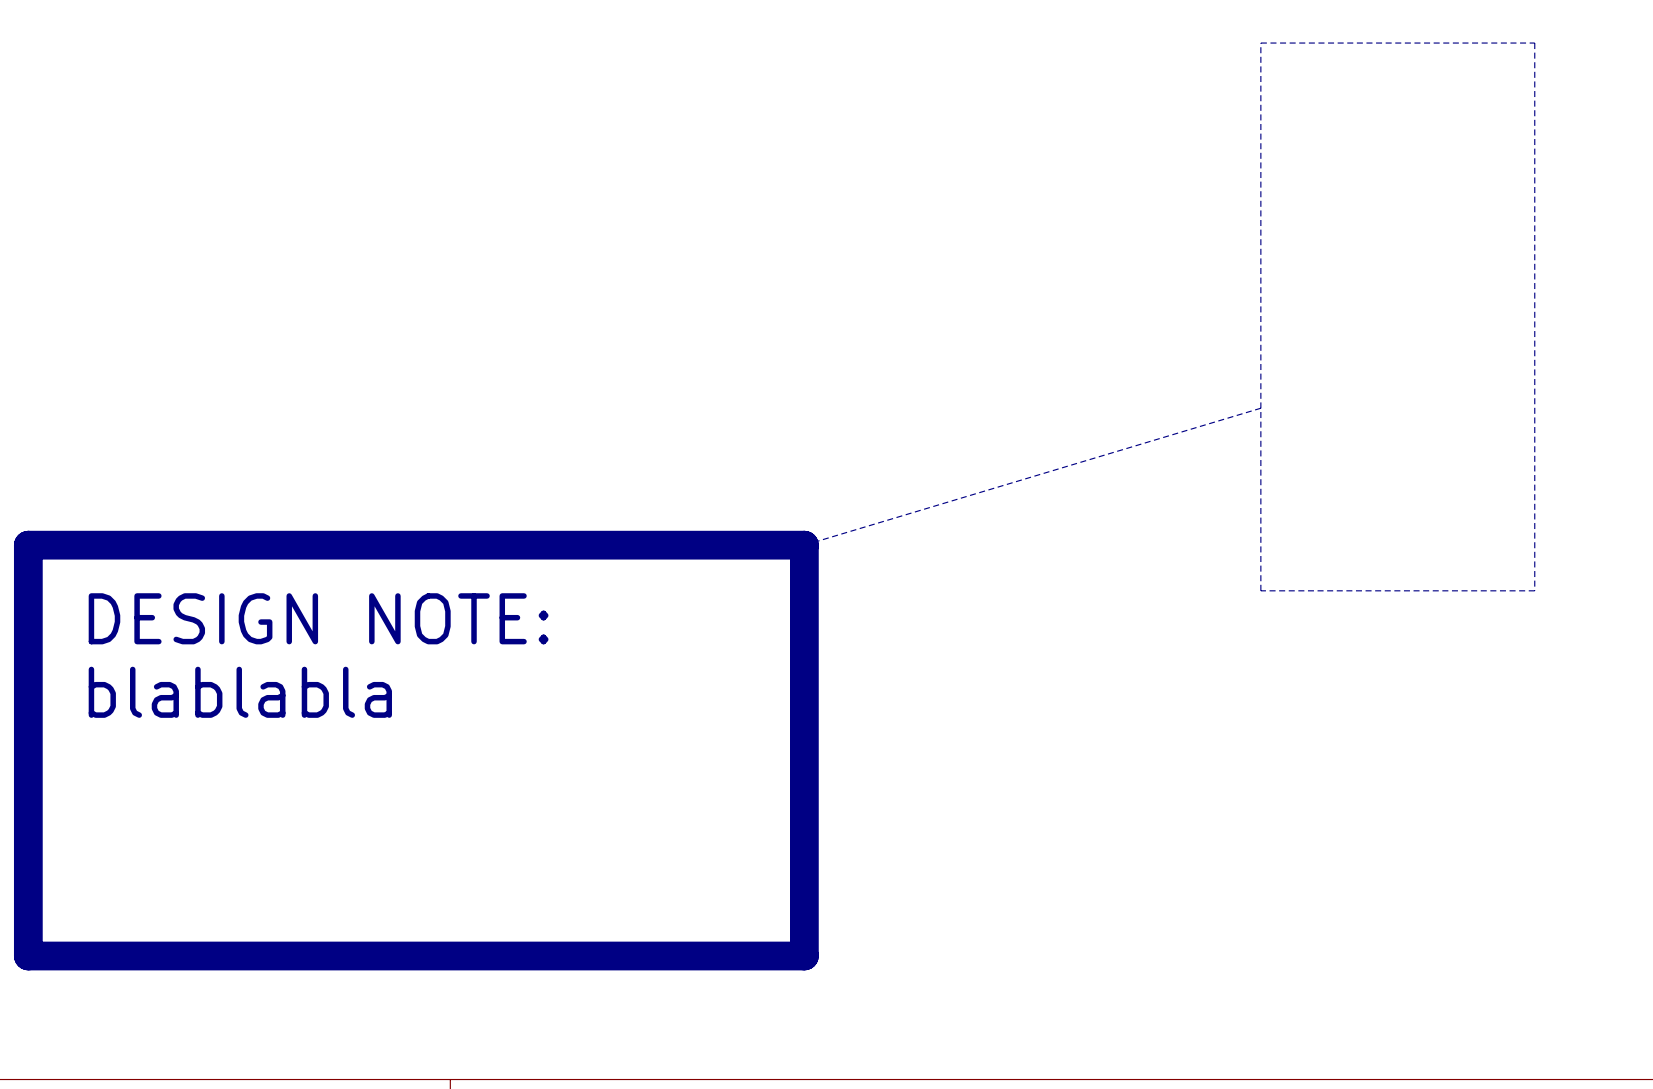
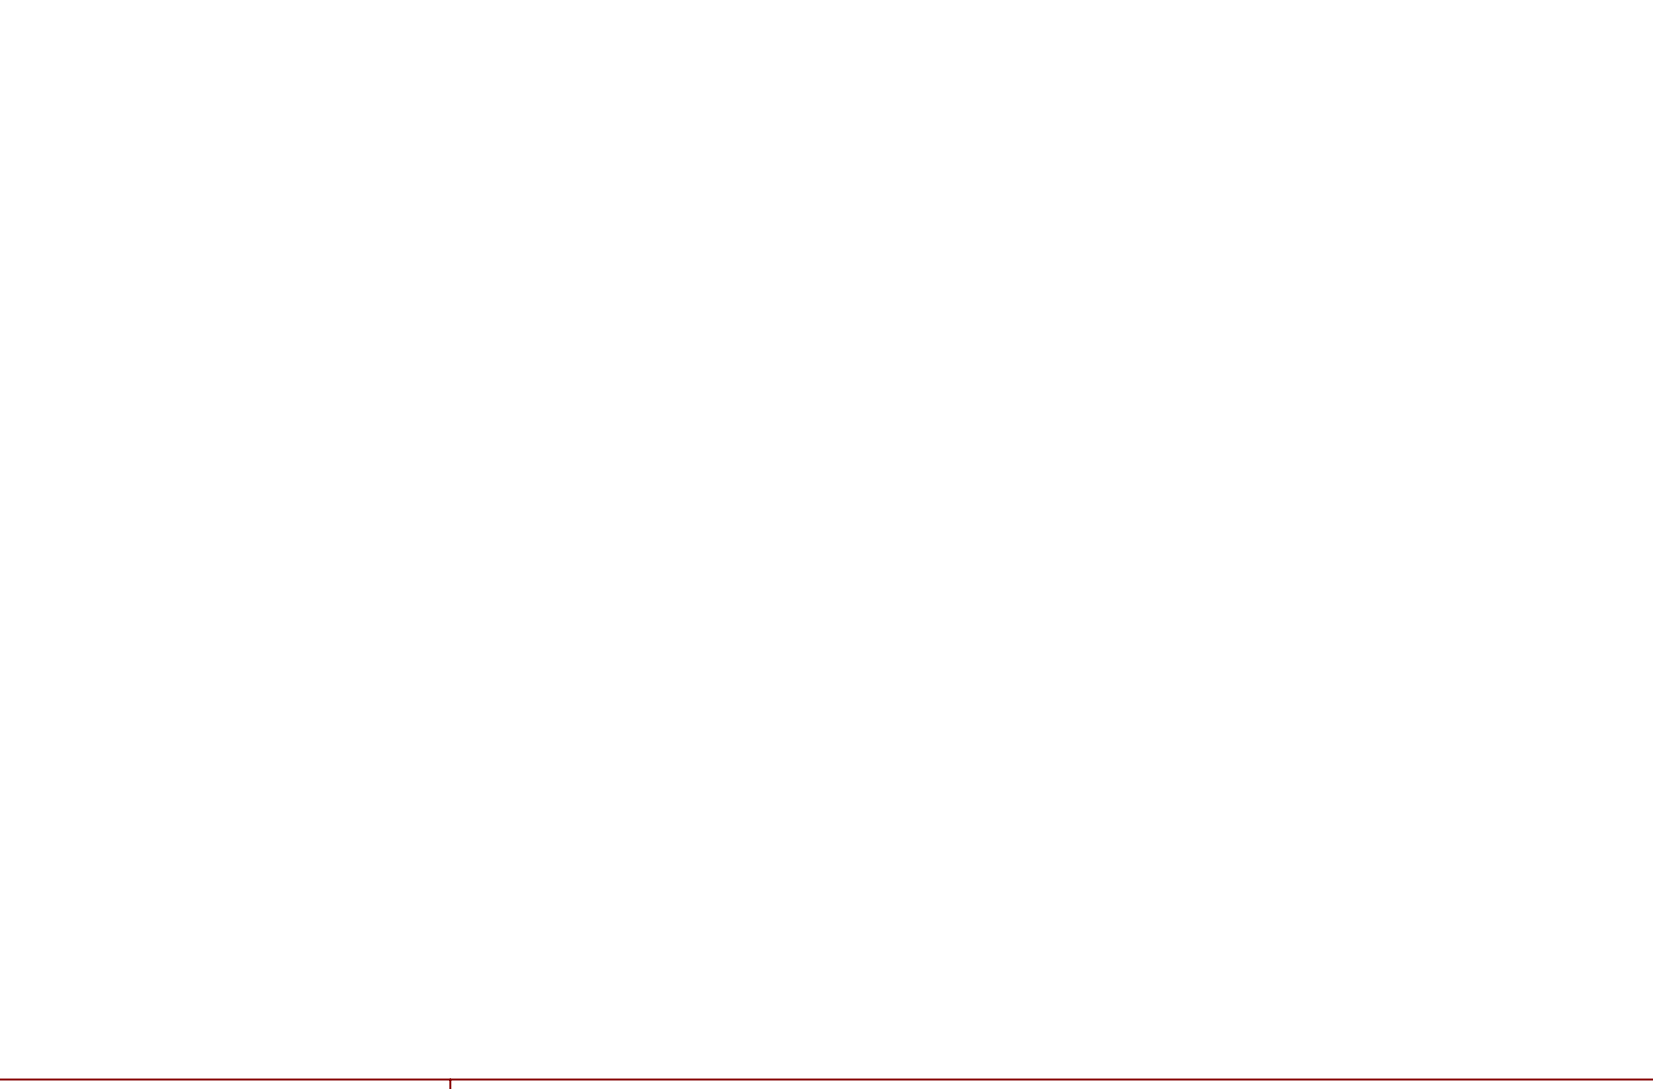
line: (1260, 43) (1534, 43) (1534, 590) (1260, 590) (1260, 43) -> none
line: (1260, 408) (804, 545) -> none
line: (804, 545) (28, 545) (28, 956) (804, 956) (804, 545) -> none
text: DESIGN NOTE: (318, 618) -> none
text: blablabla (240, 692) -> none

